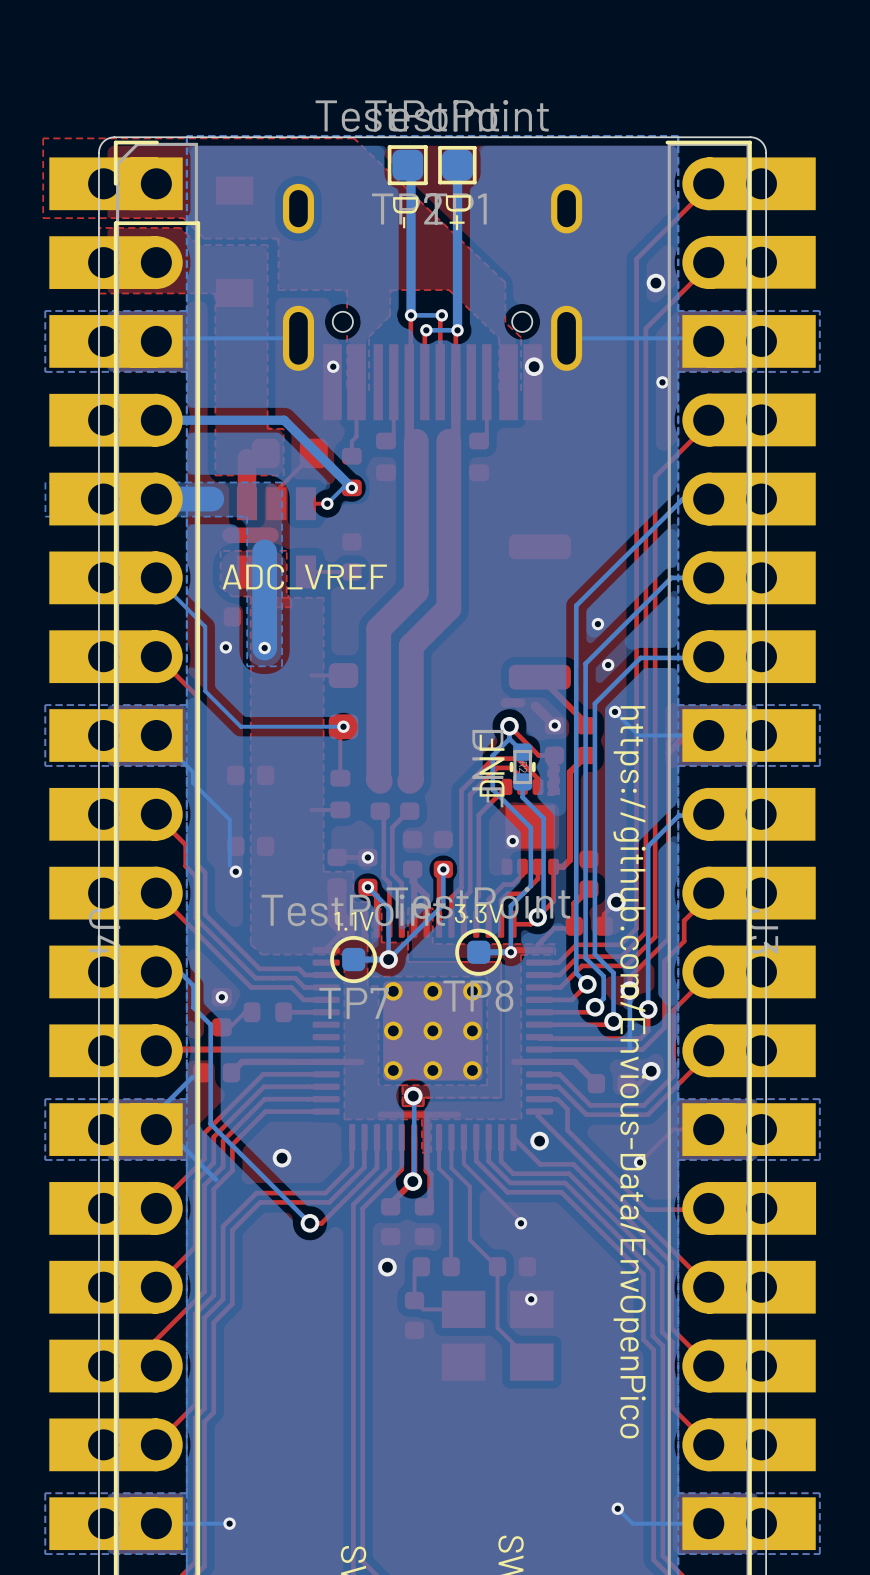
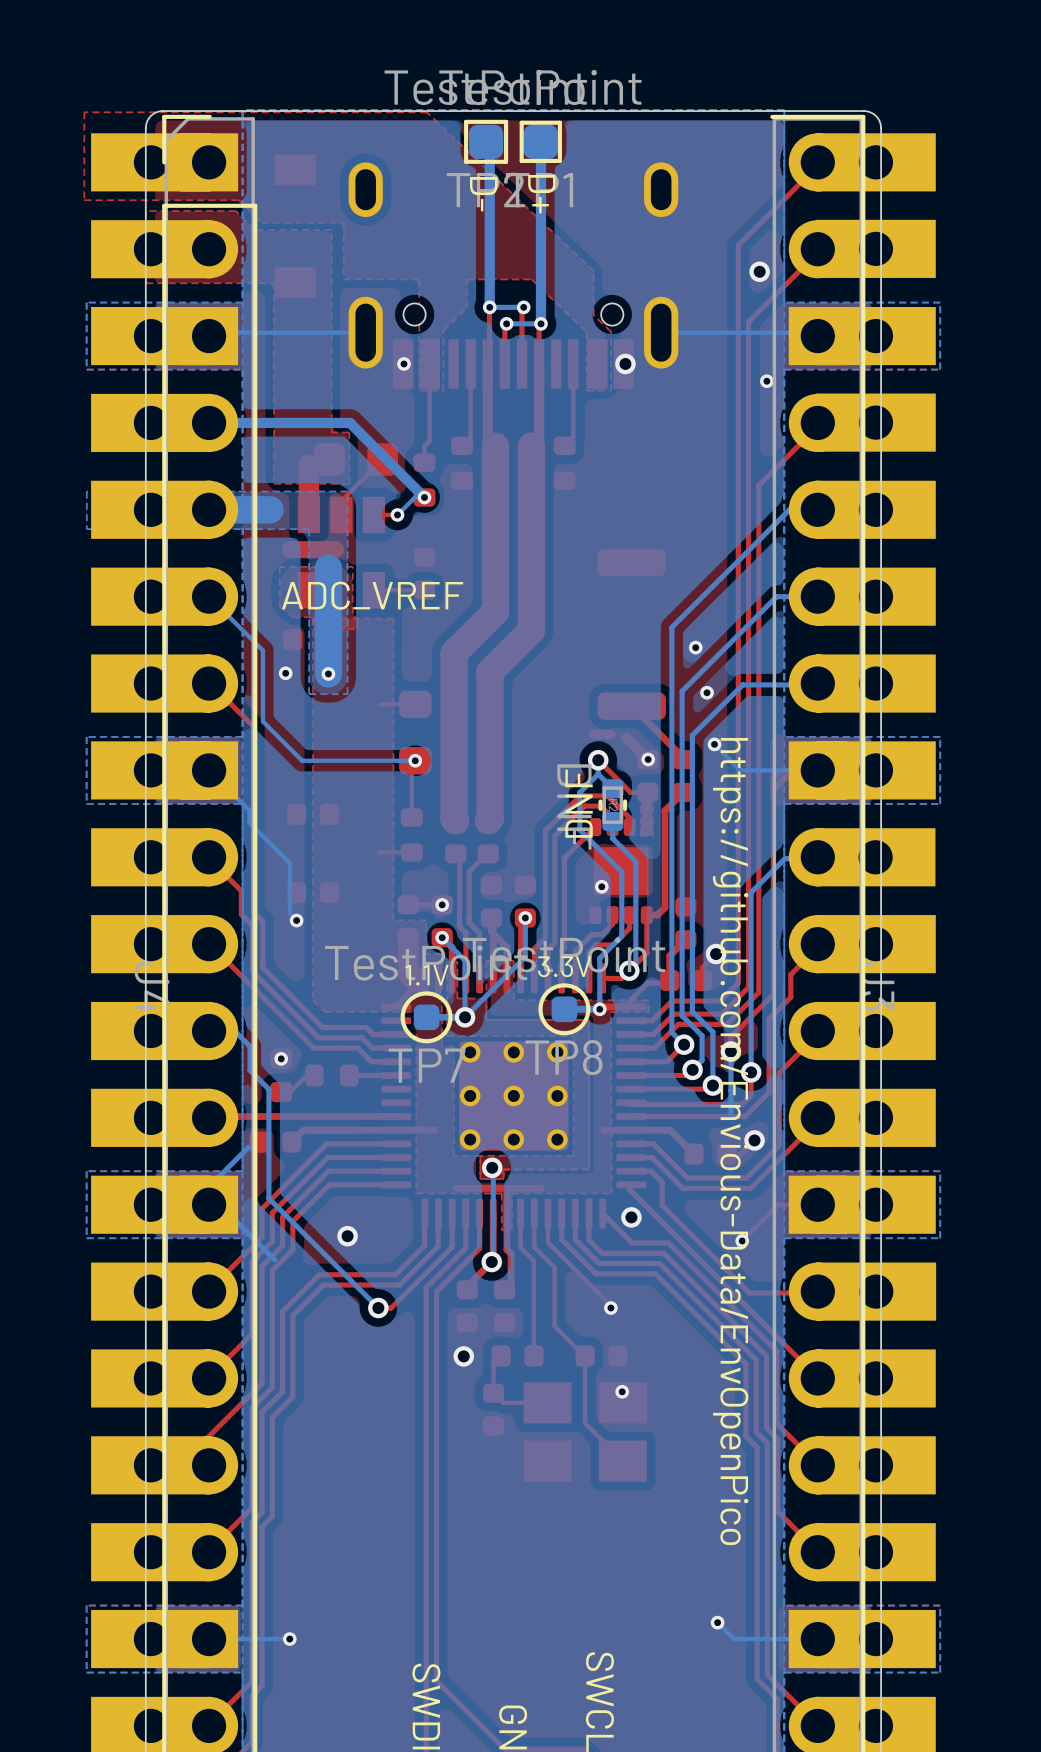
part footprint: [282, 183, 583, 421] -> [348, 162, 679, 389]

